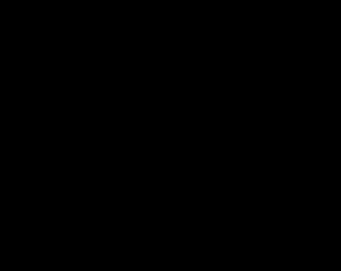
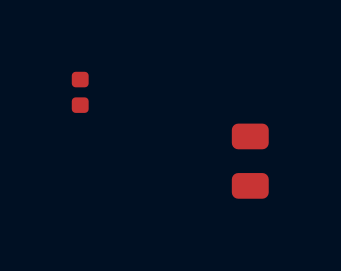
part: none -> (80, 92)
part: none -> (250, 161)

